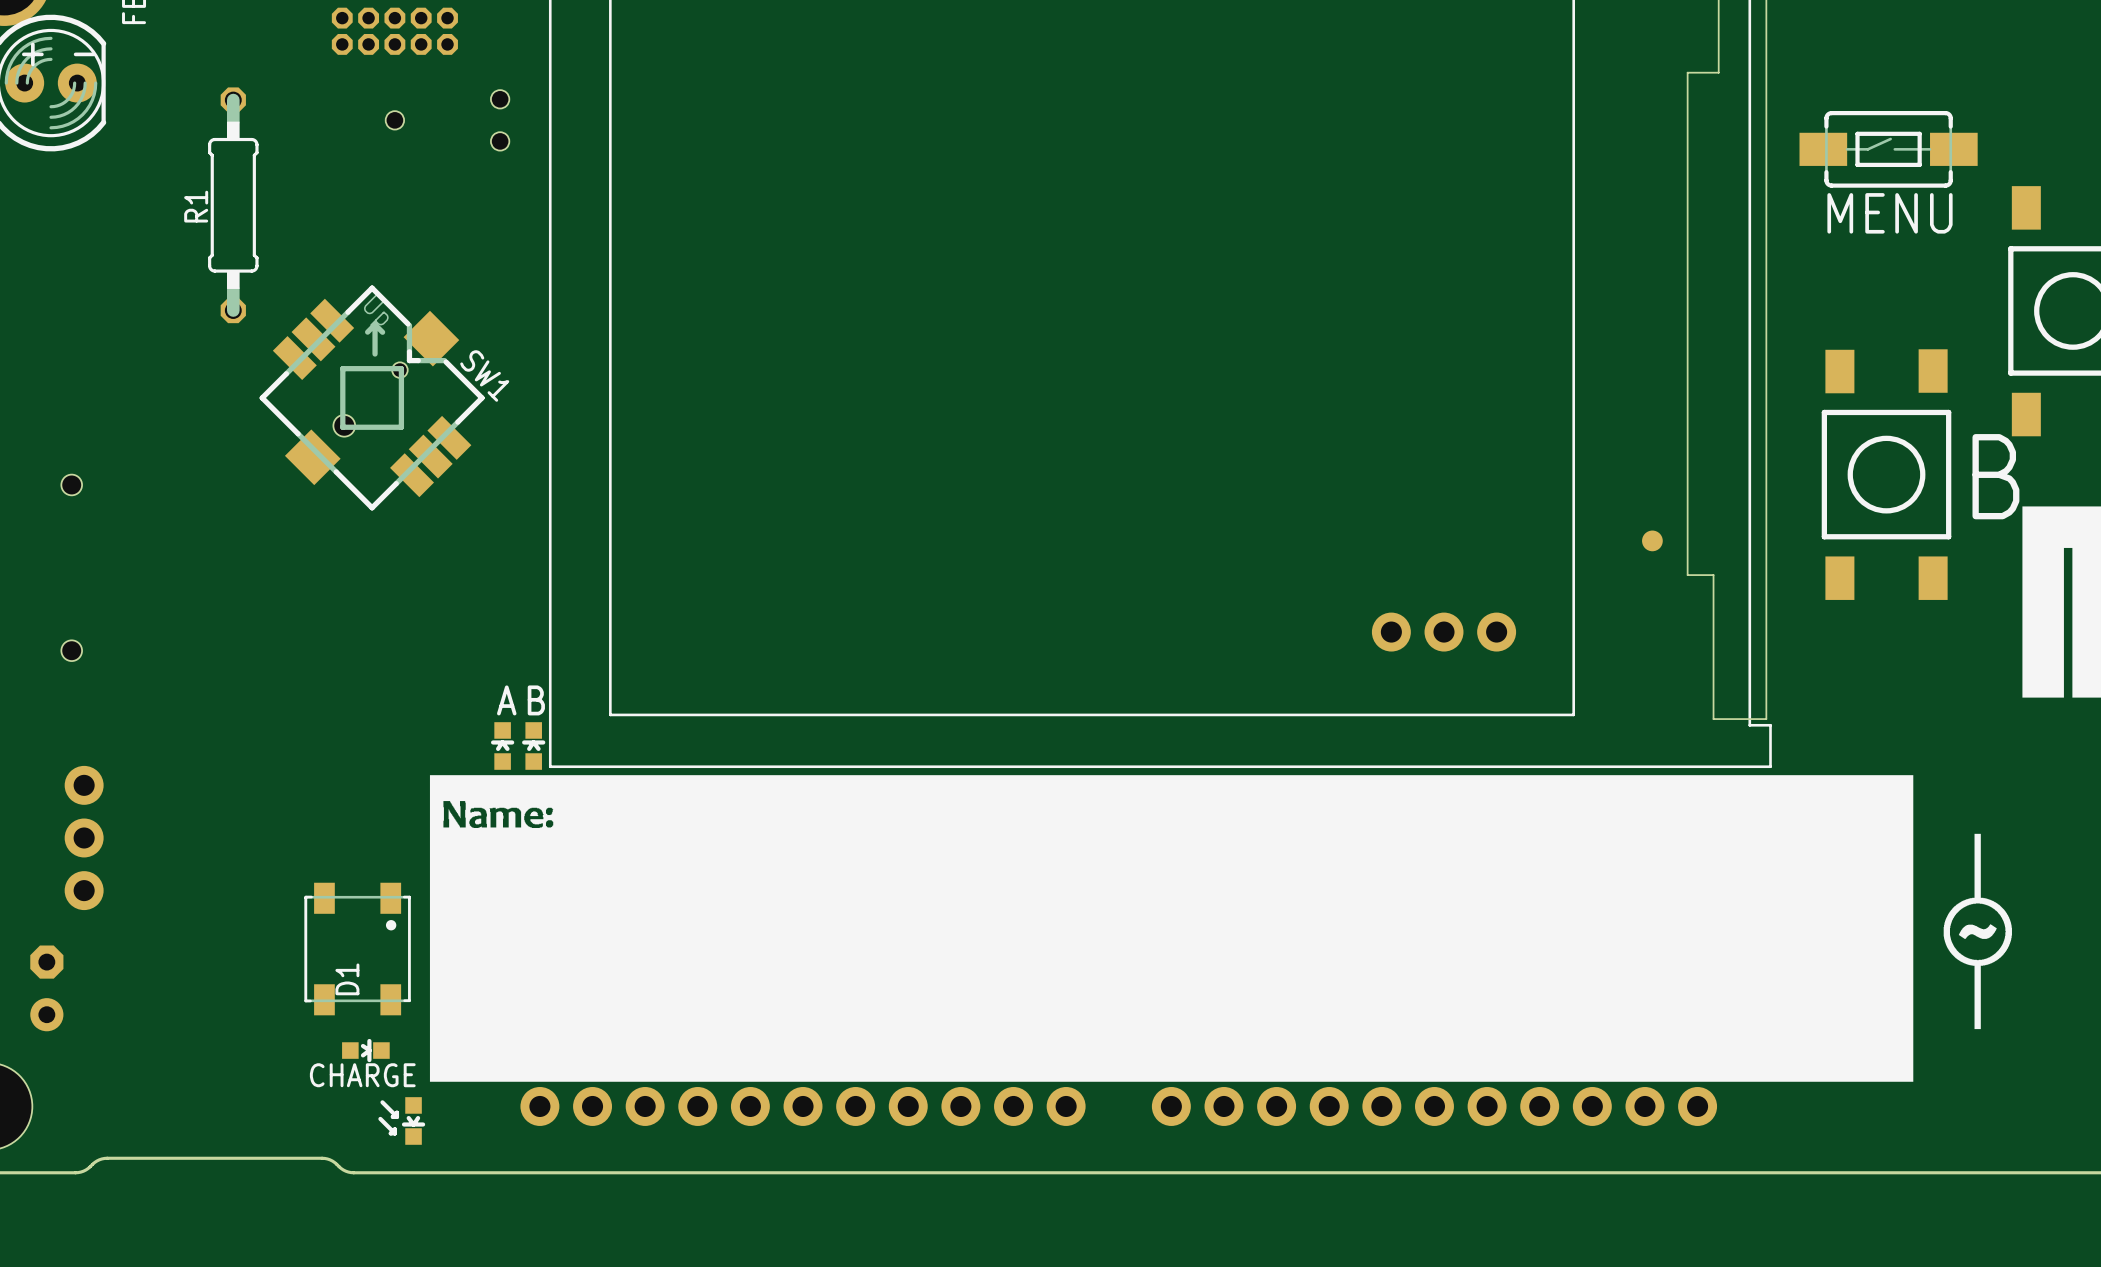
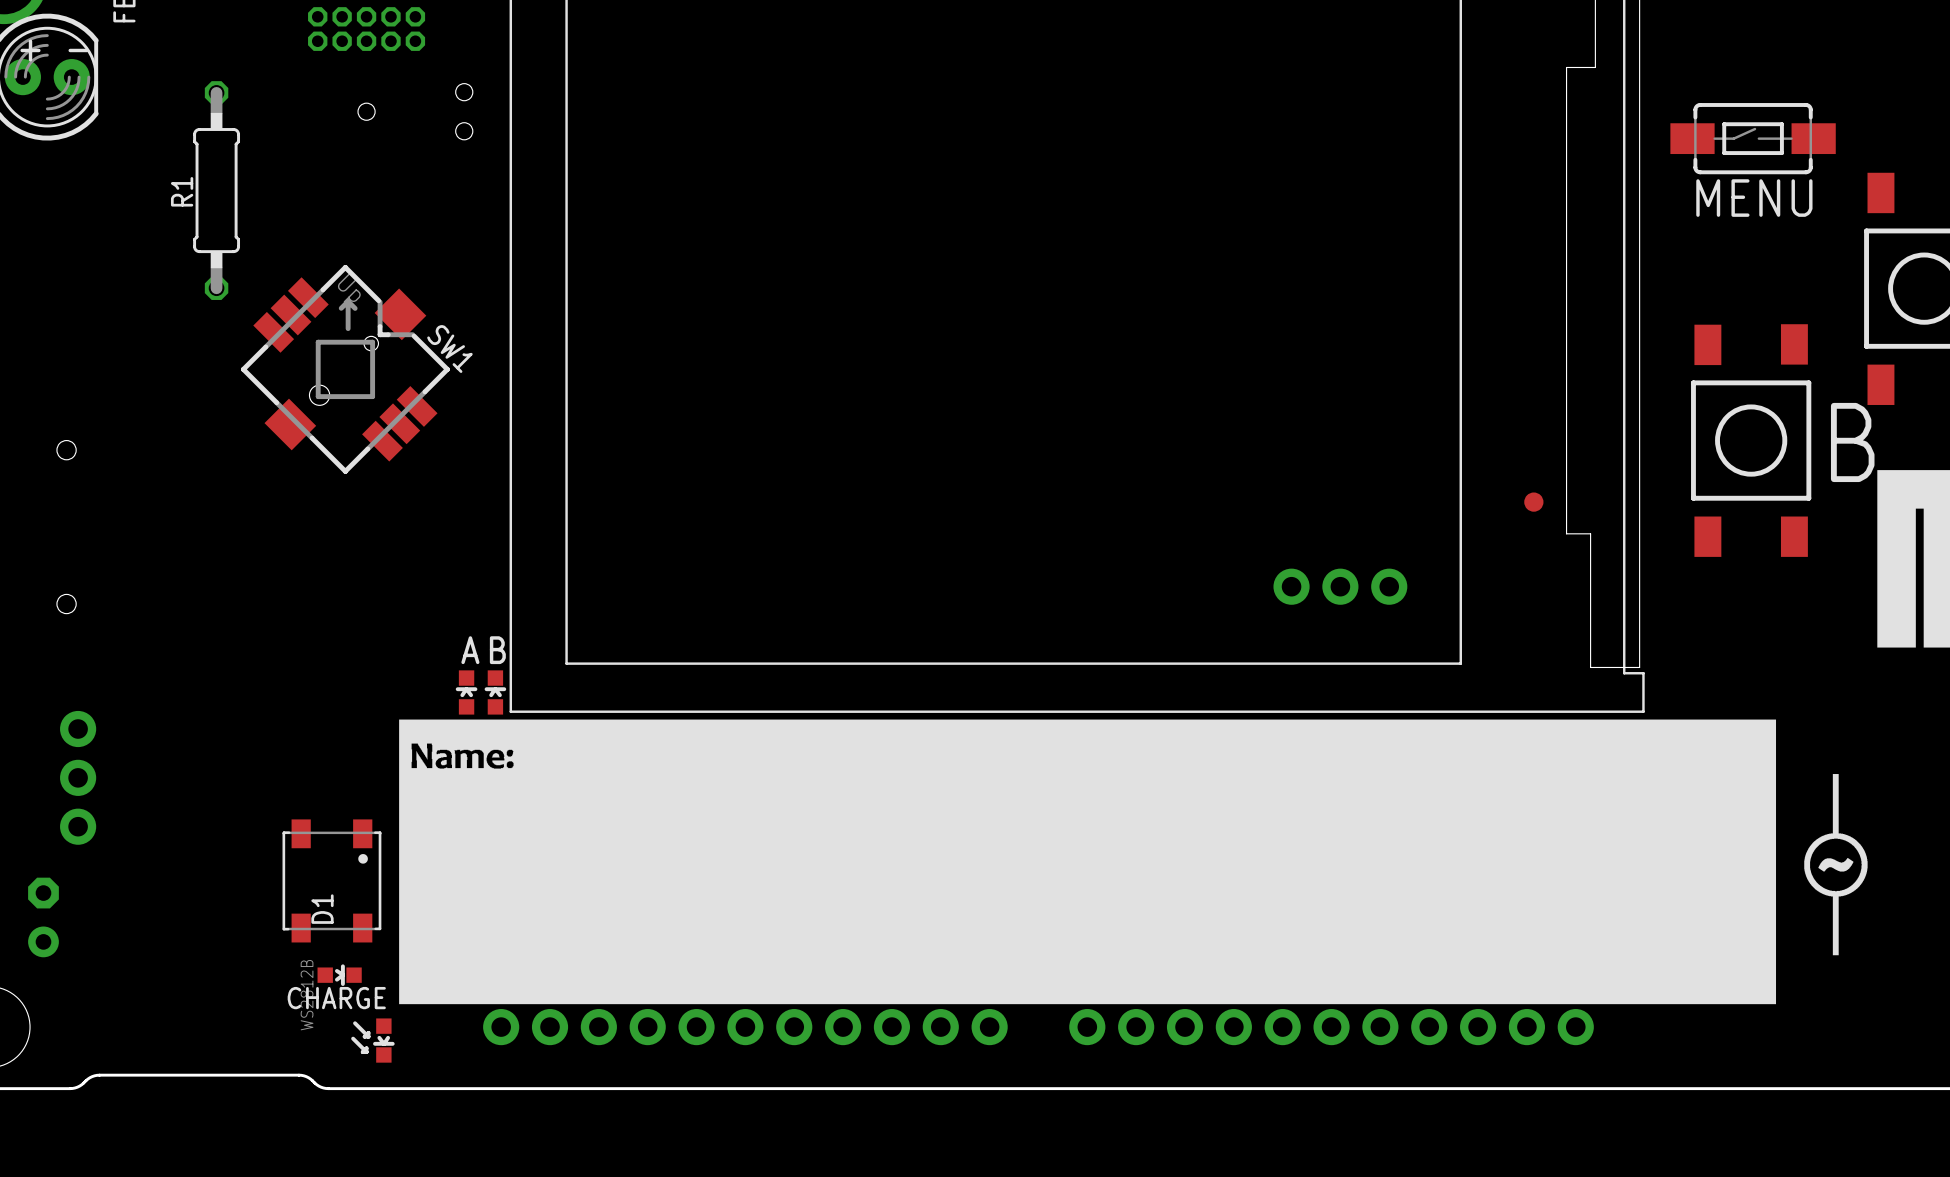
D1 value: none -> WS2812B (307, 995)

